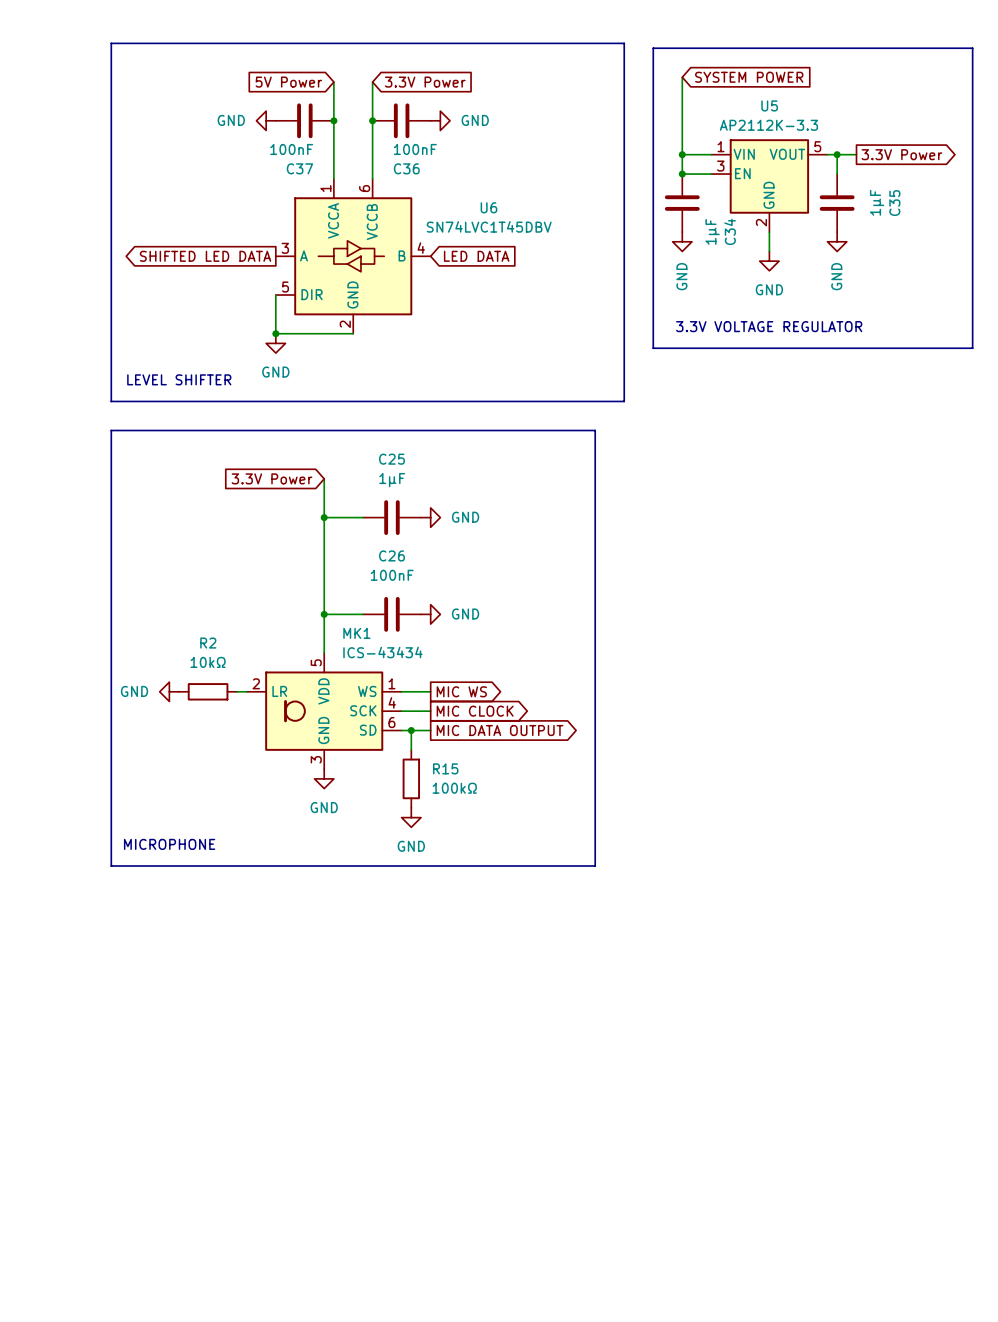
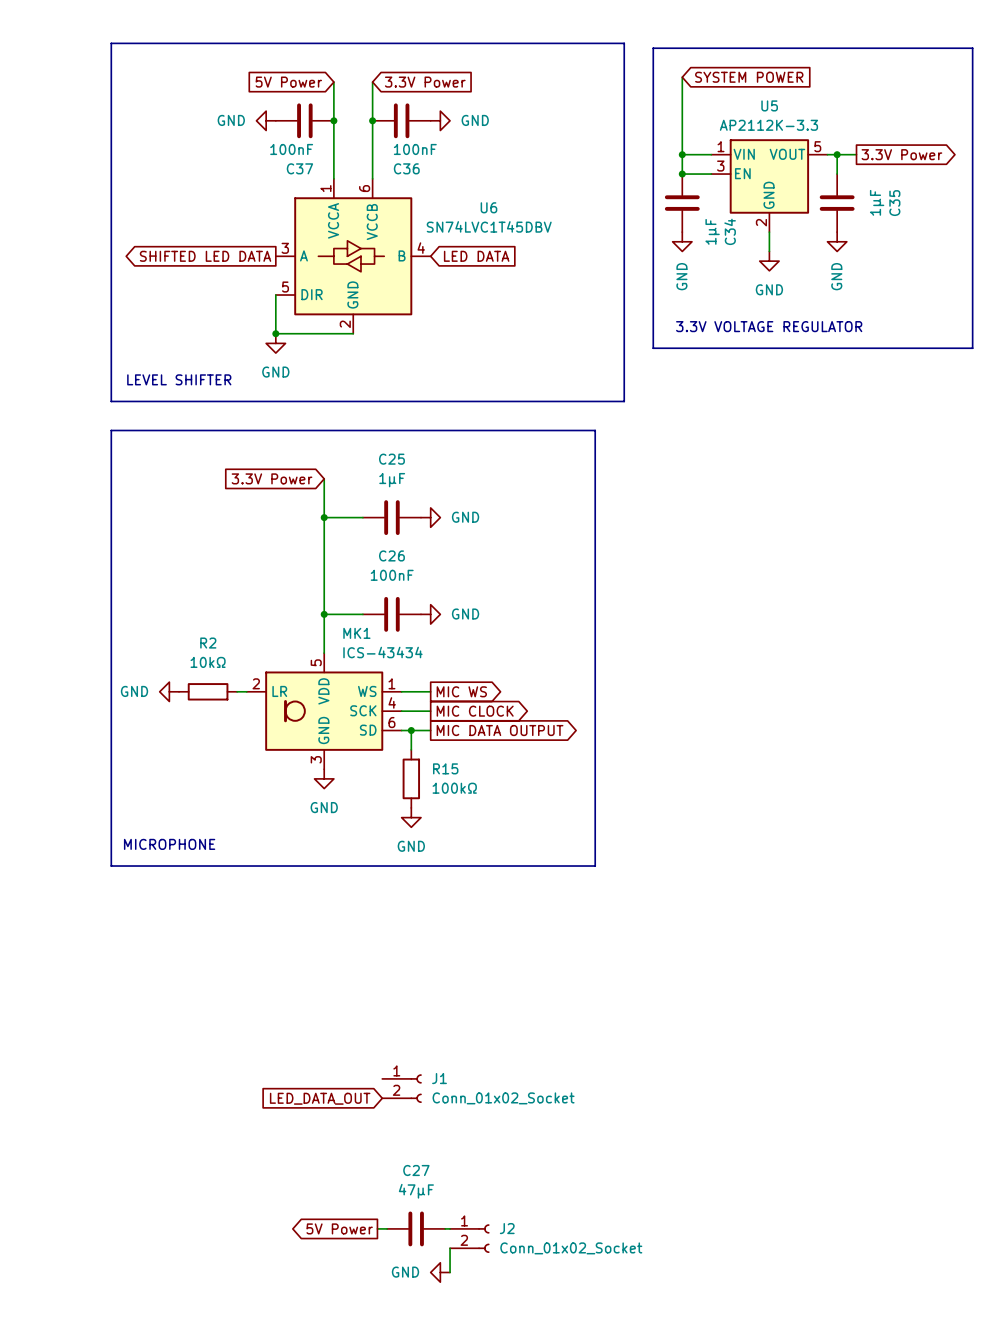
J1: none -> Conn_01x02_Socket (401, 1088)
global label: none -> LED_DATA_OUT (320, 1098)
global label: none -> 5V Power (339, 1228)
wire: none -> (377, 1228) (387, 1228)
C27: none -> 47µF (416, 1228)
wire: none -> (445, 1228) (450, 1228)
J2: none -> Conn_01x02_Socket (469, 1238)
wire: none -> (450, 1248) (450, 1272)
power symbol: none -> GND (440, 1272)

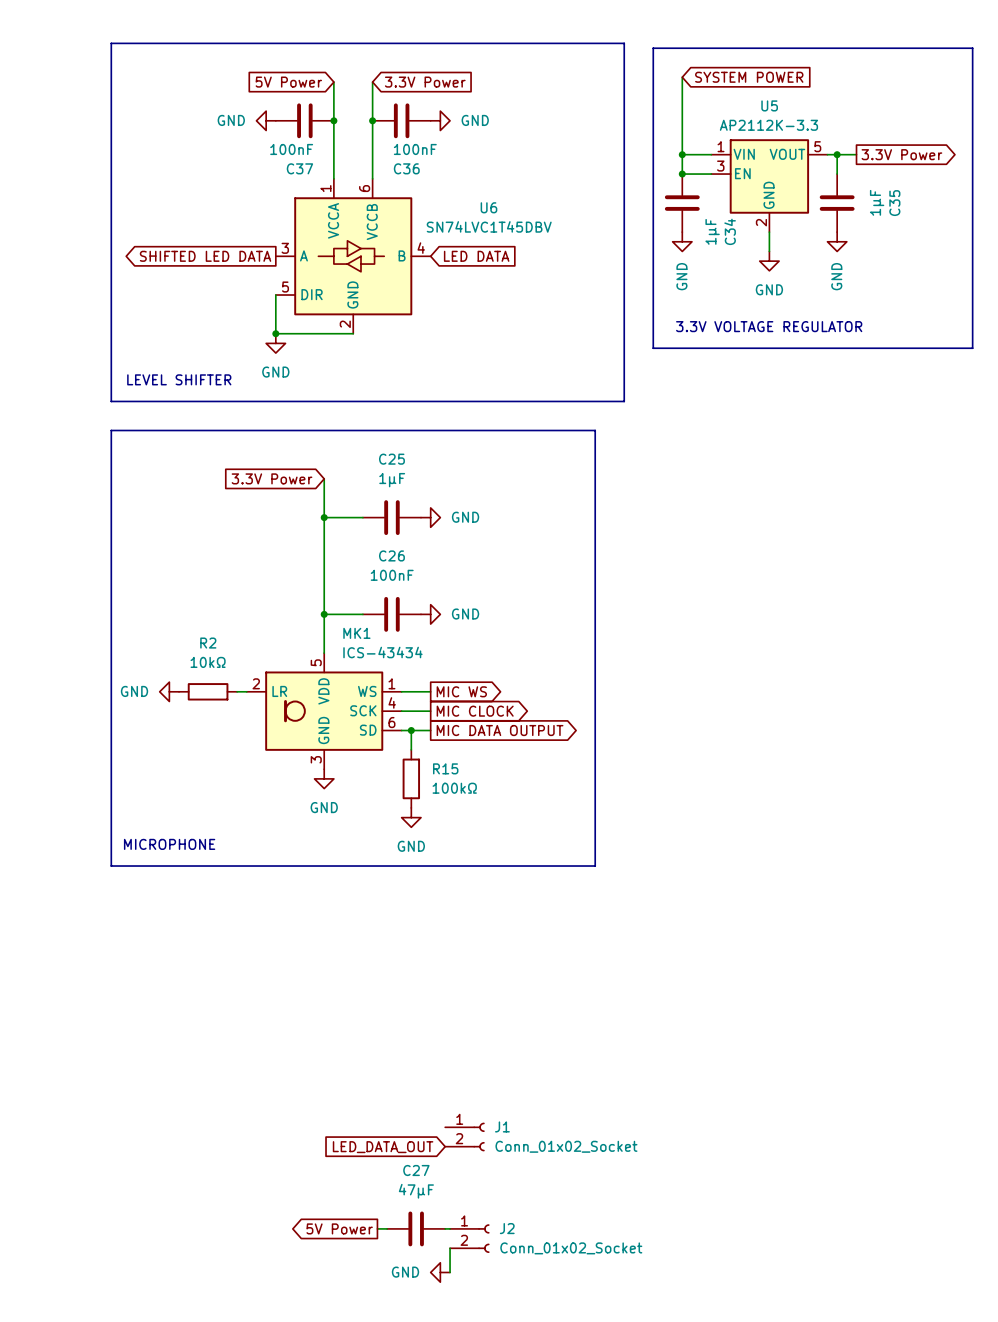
J1 position: (401, 1088) -> (464, 1136)
global label position: LED_DATA_OUT (320, 1098) -> LED_DATA_OUT (383, 1147)

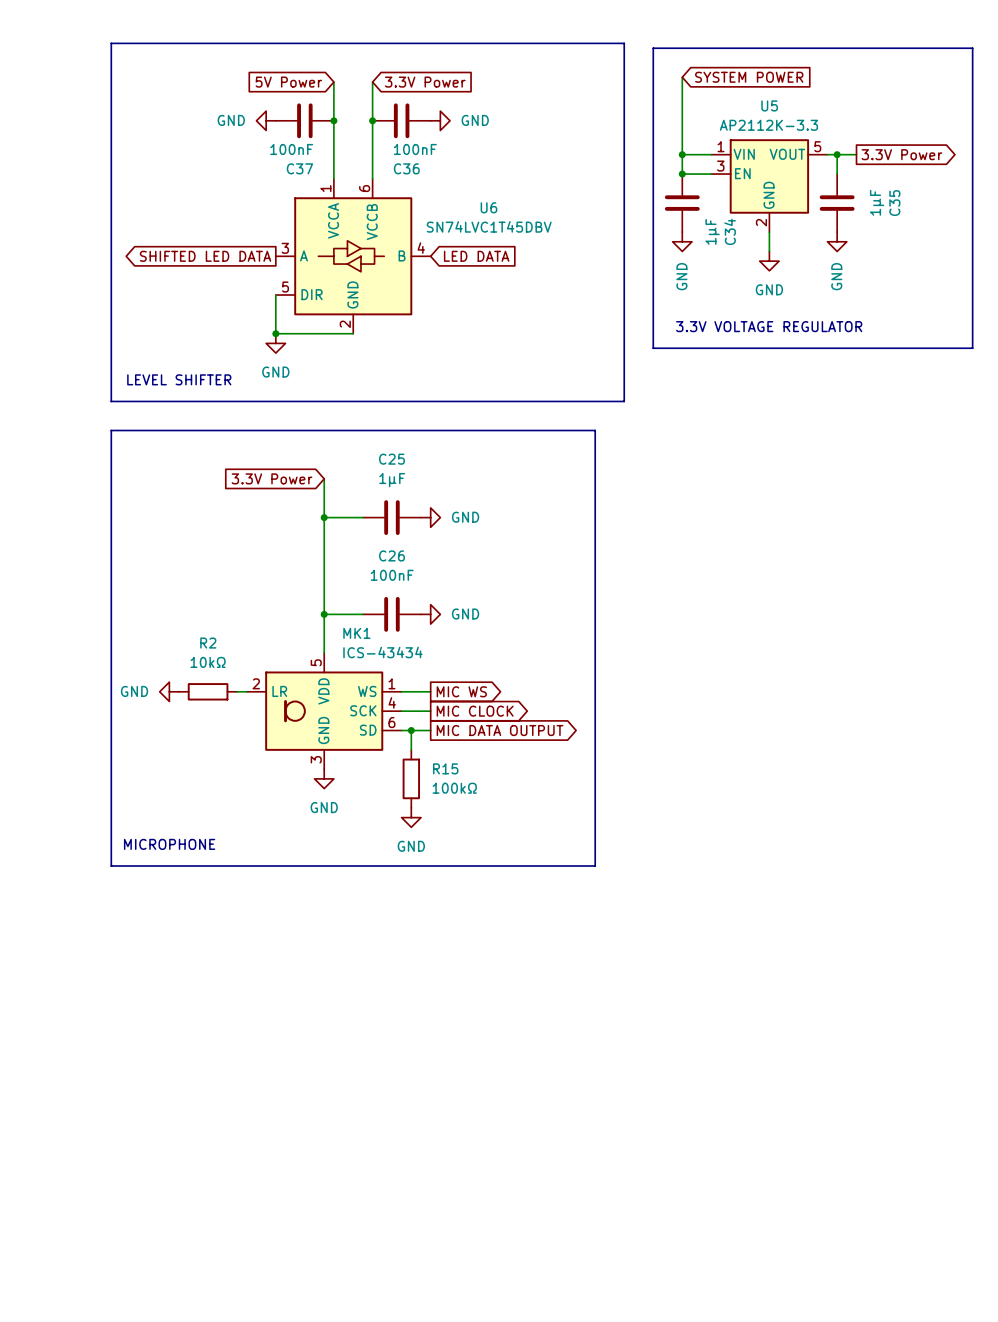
J1: Conn_01x02_Socket (464, 1136) -> none
global label: LED_DATA_OUT (383, 1147) -> none
global label: 5V Power (339, 1228) -> none
wire: (377, 1228) (387, 1228) -> none
C27: 47µF (416, 1228) -> none
wire: (445, 1228) (450, 1228) -> none
J2: Conn_01x02_Socket (469, 1238) -> none
wire: (450, 1248) (450, 1272) -> none
power symbol: GND (440, 1272) -> none

